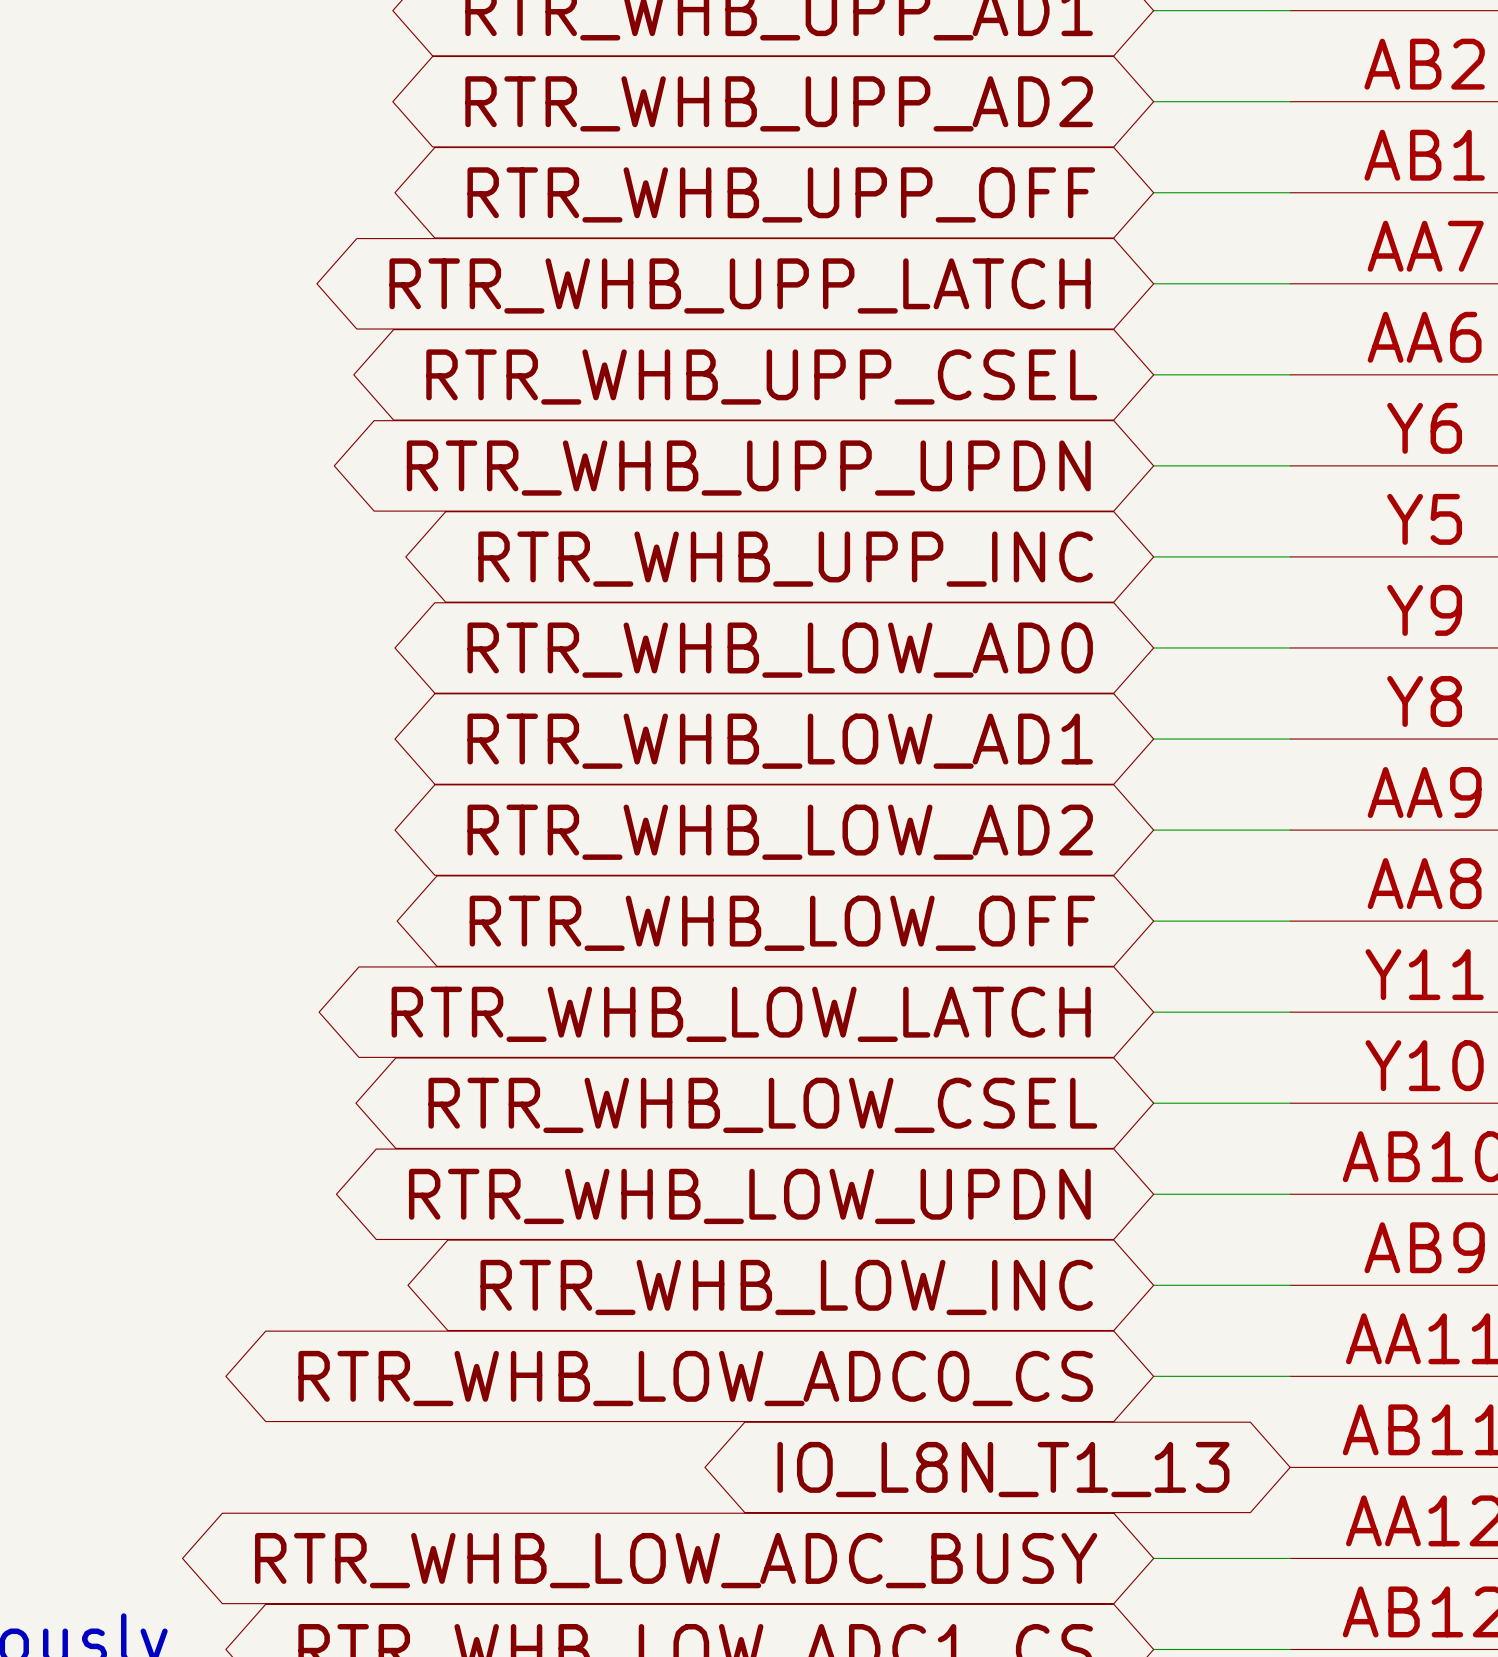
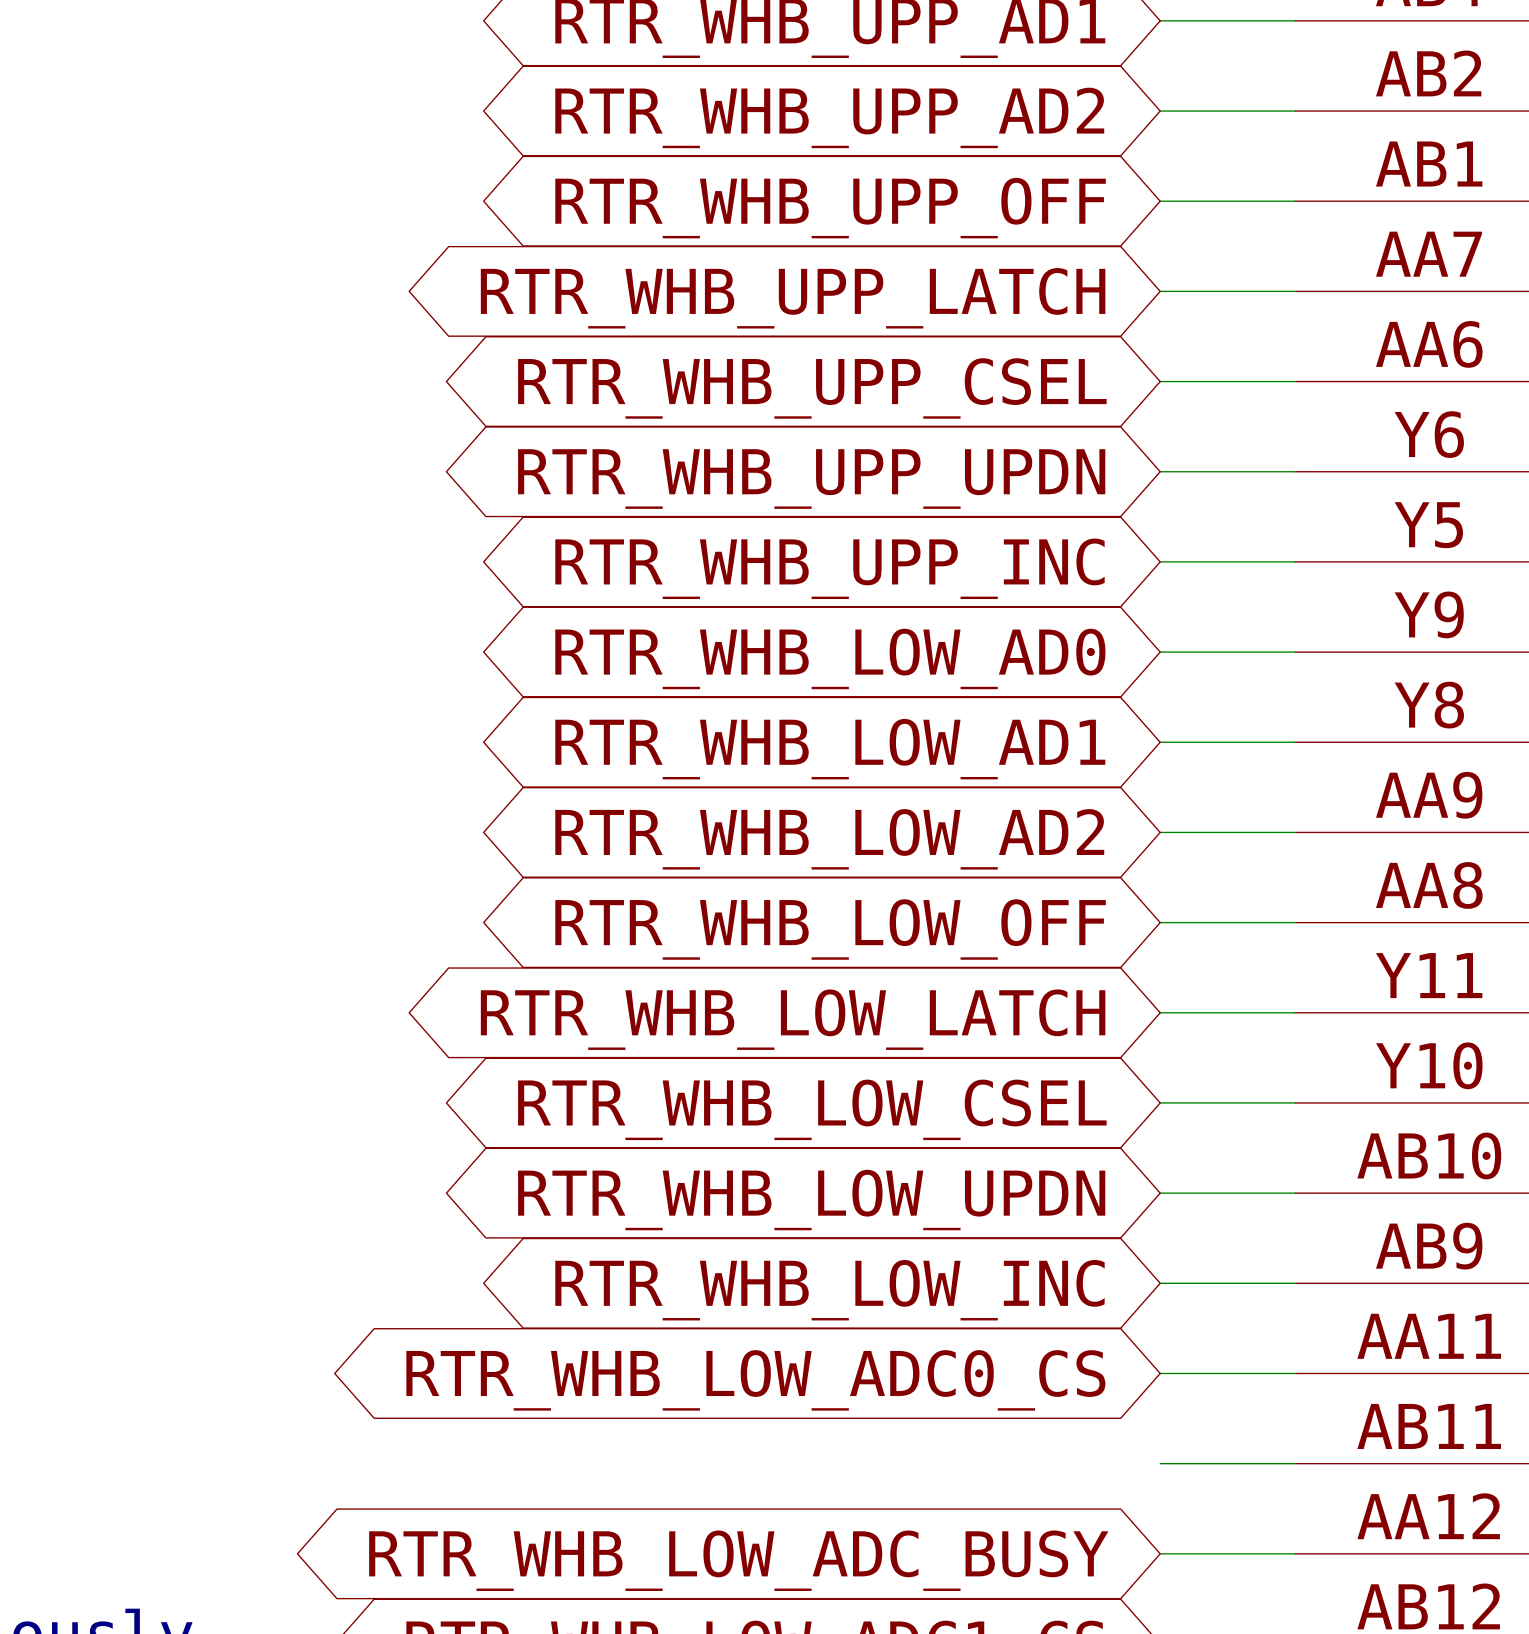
wire: none -> (1160, 1463) (1295, 1463)
global label: IO_L8N_T1_13 (1003, 1469) -> none

